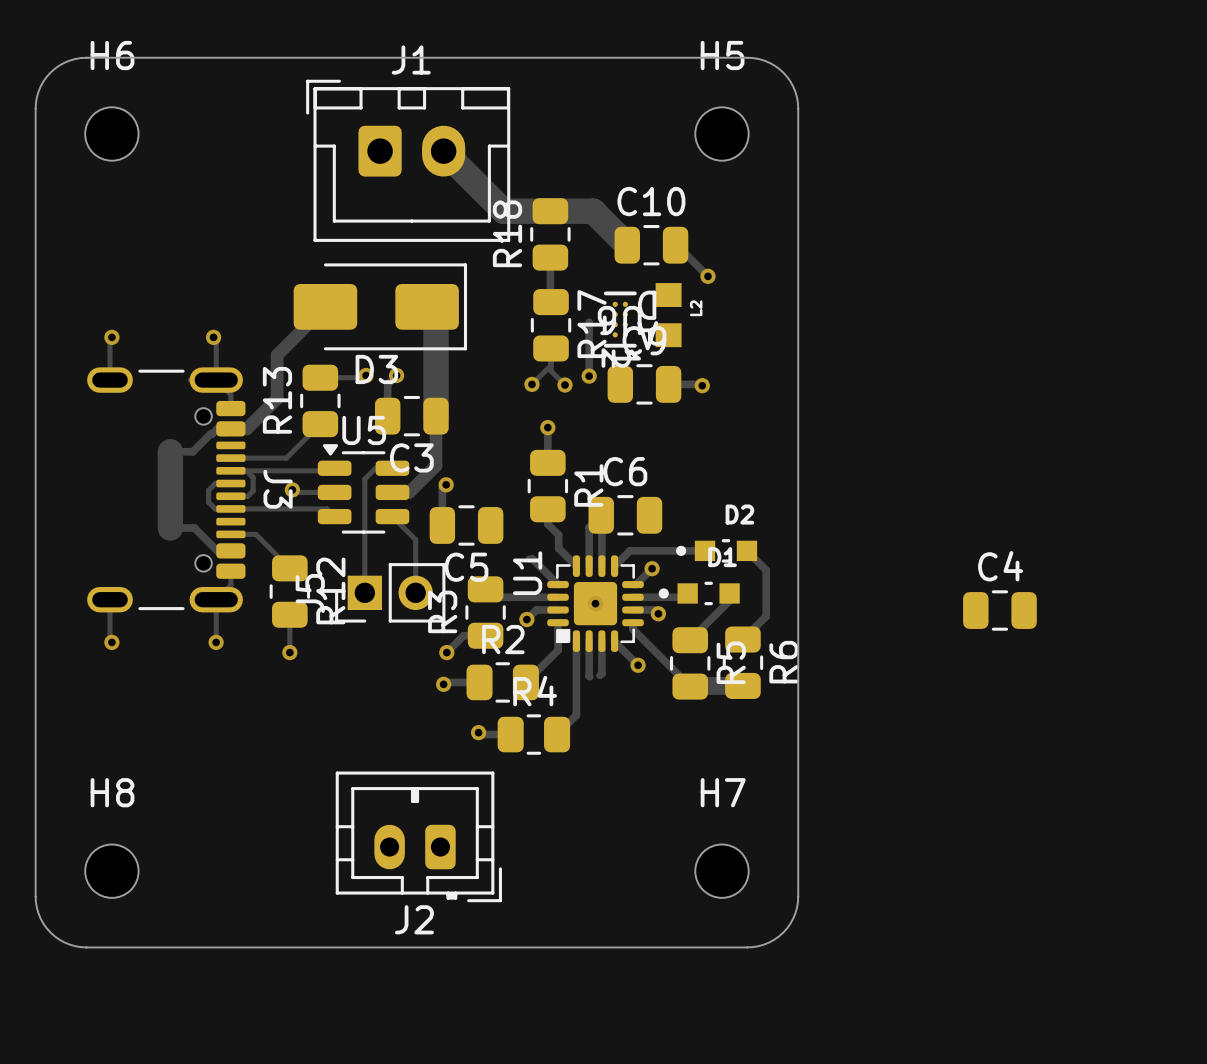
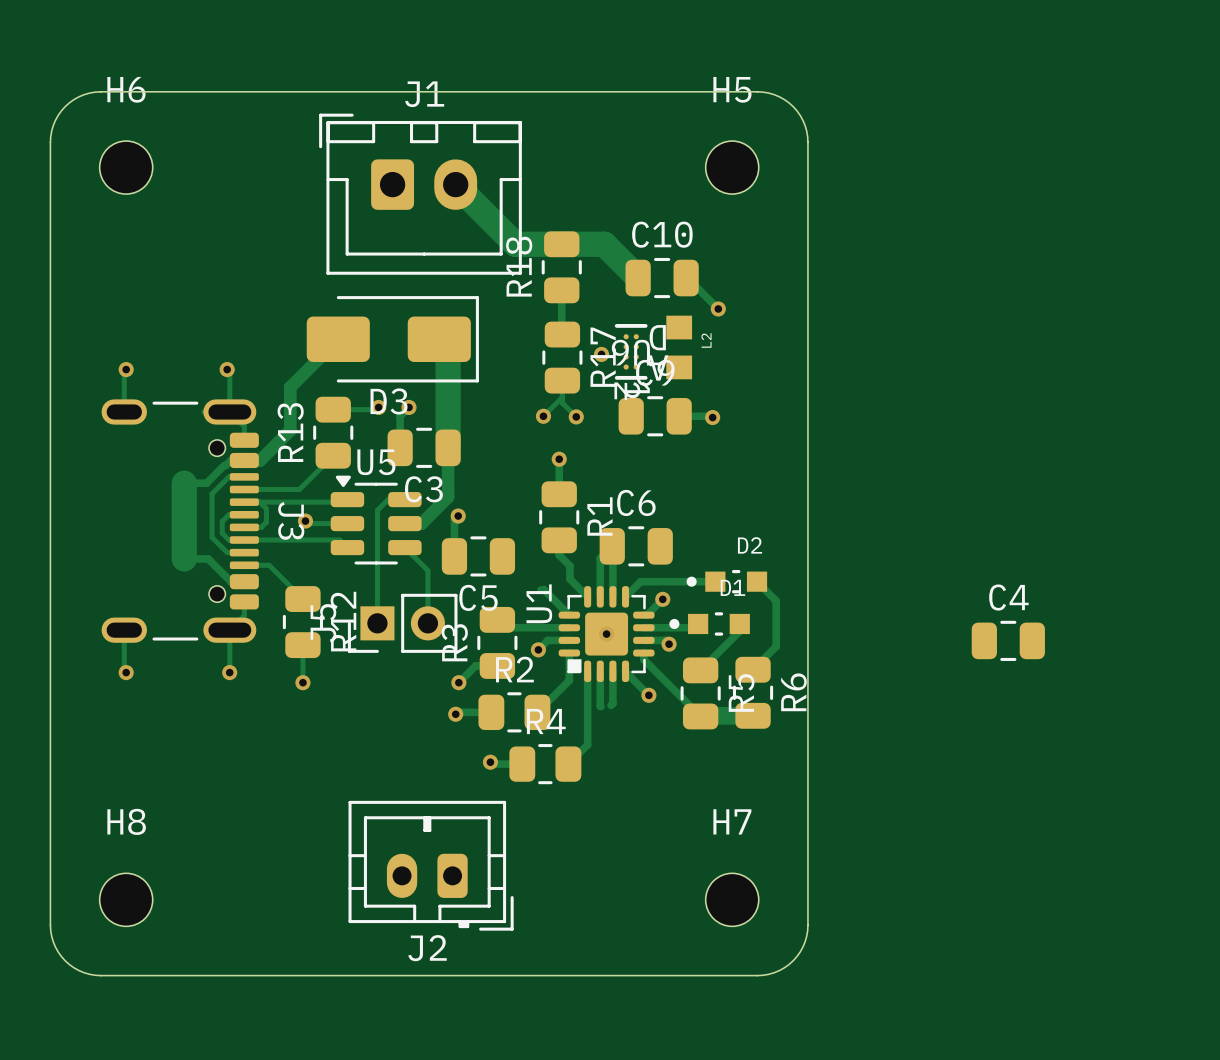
track: (589, 322) (589, 376) -> none
via position: (589, 376) -> (601, 354)
track: none -> (244, 476) (228, 476) (212, 493) (212, 537) (227, 552) (244, 552)

